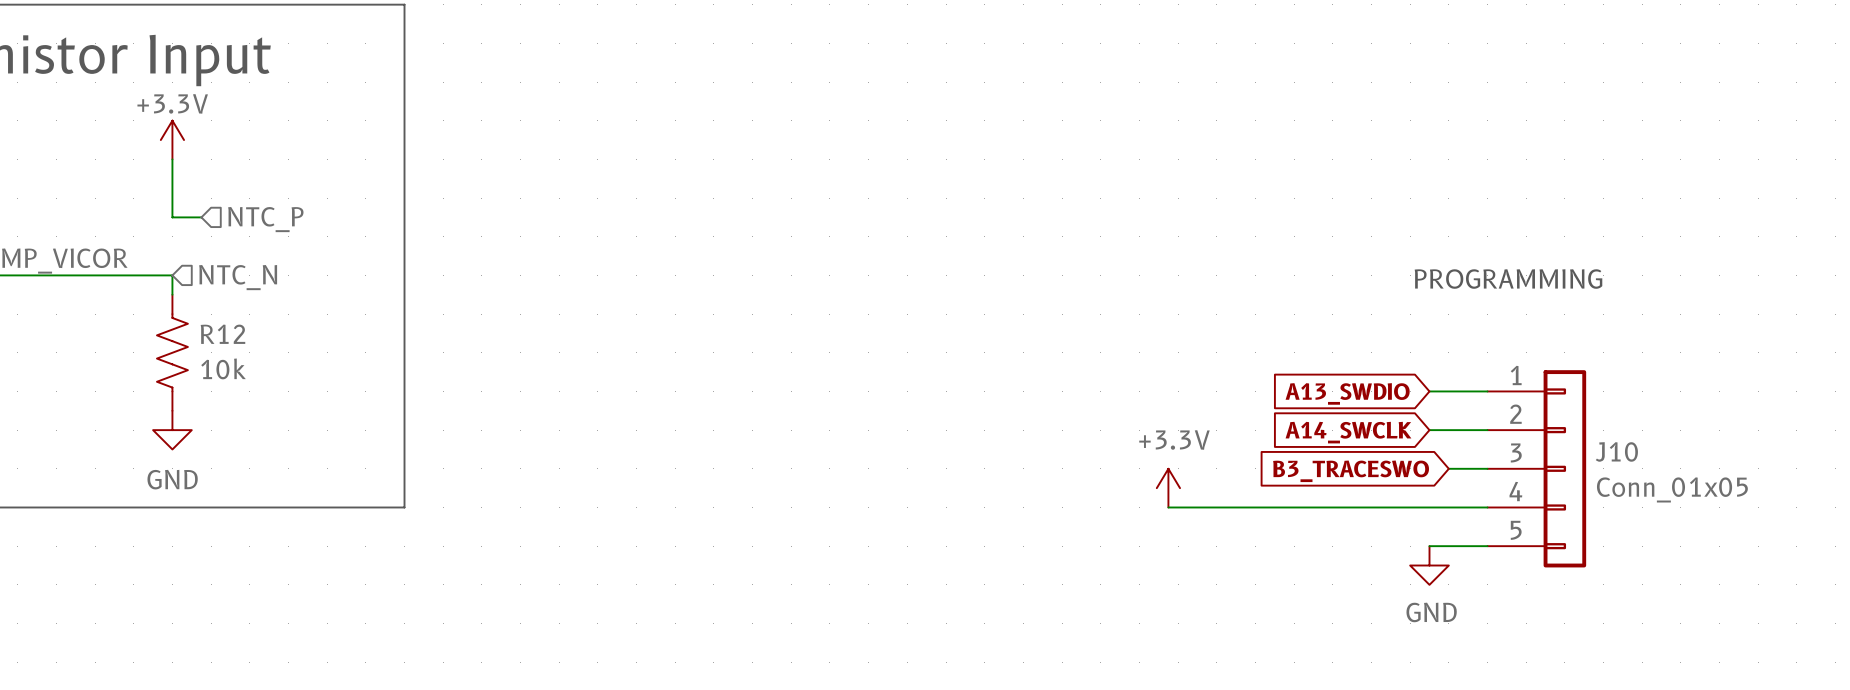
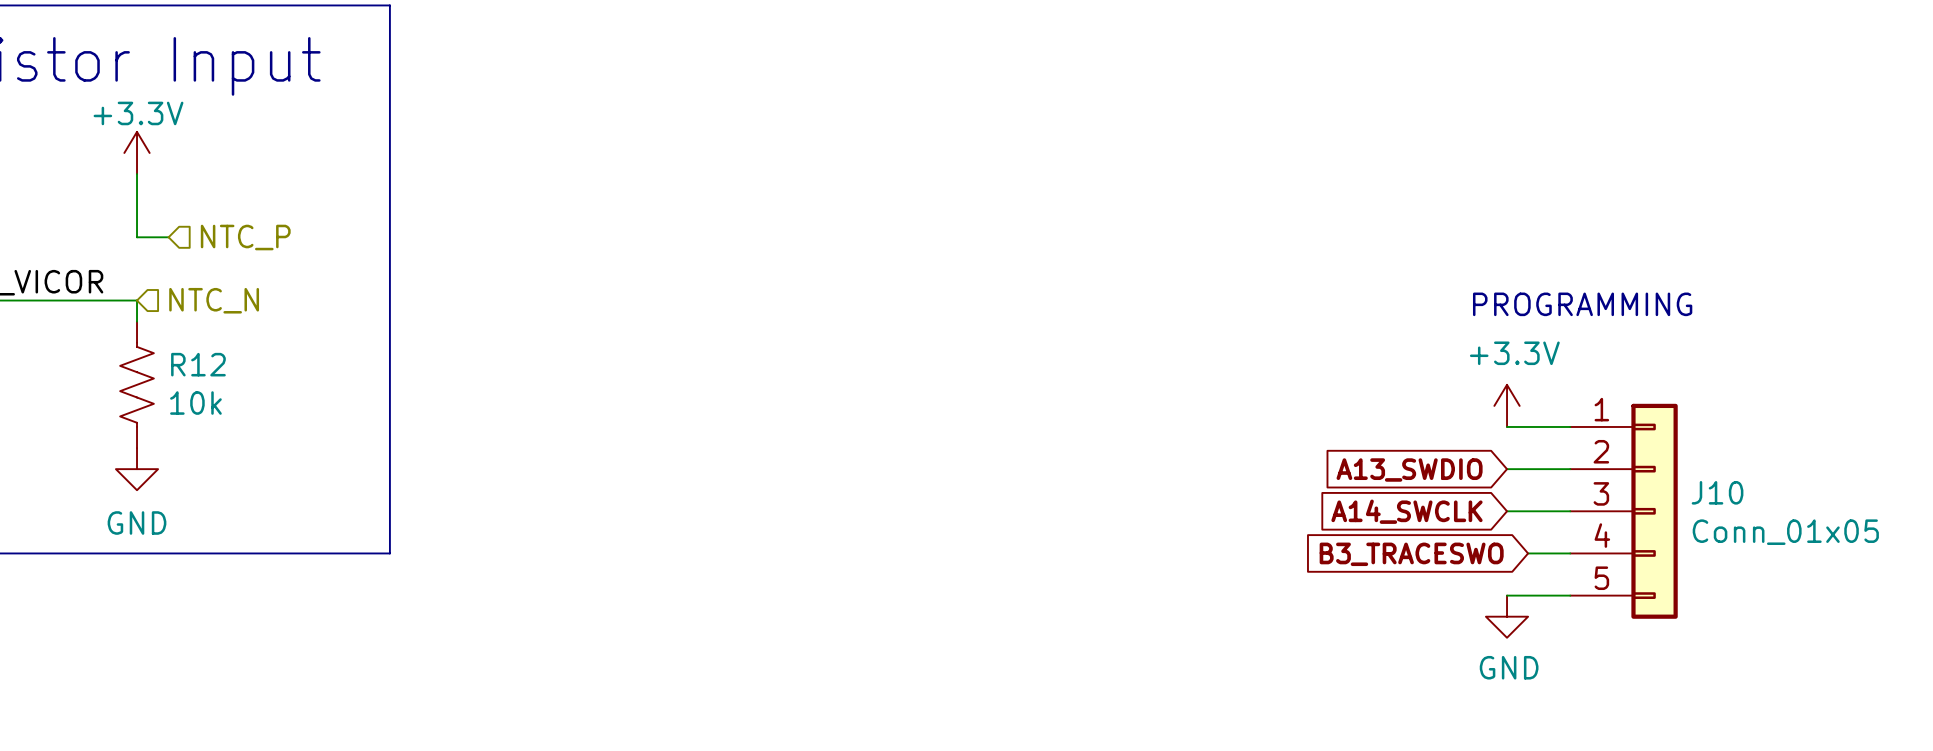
global label: A13_SWDIO (1347, 393) -> none
global label: A14_SWCLK (1348, 432) -> A13_SWDIO (1409, 470)
wire: none -> (1507, 511) (1528, 511)
global label: none -> A14_SWCLK (1406, 511)
global label position: B3_TRACESWO (1351, 471) -> B3_TRACESWO (1411, 554)
power symbol position: +3.3V (1168, 488) -> +3.3V (1507, 405)
wire: (1168, 507) (1448, 507) -> none

